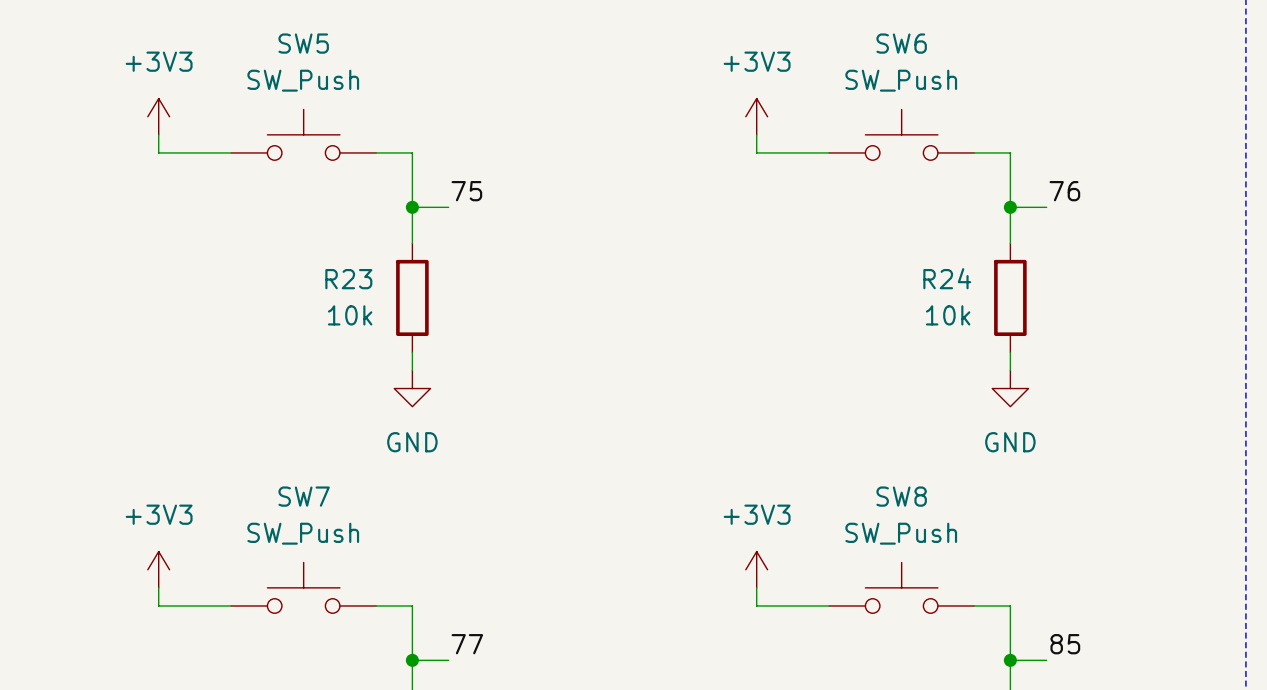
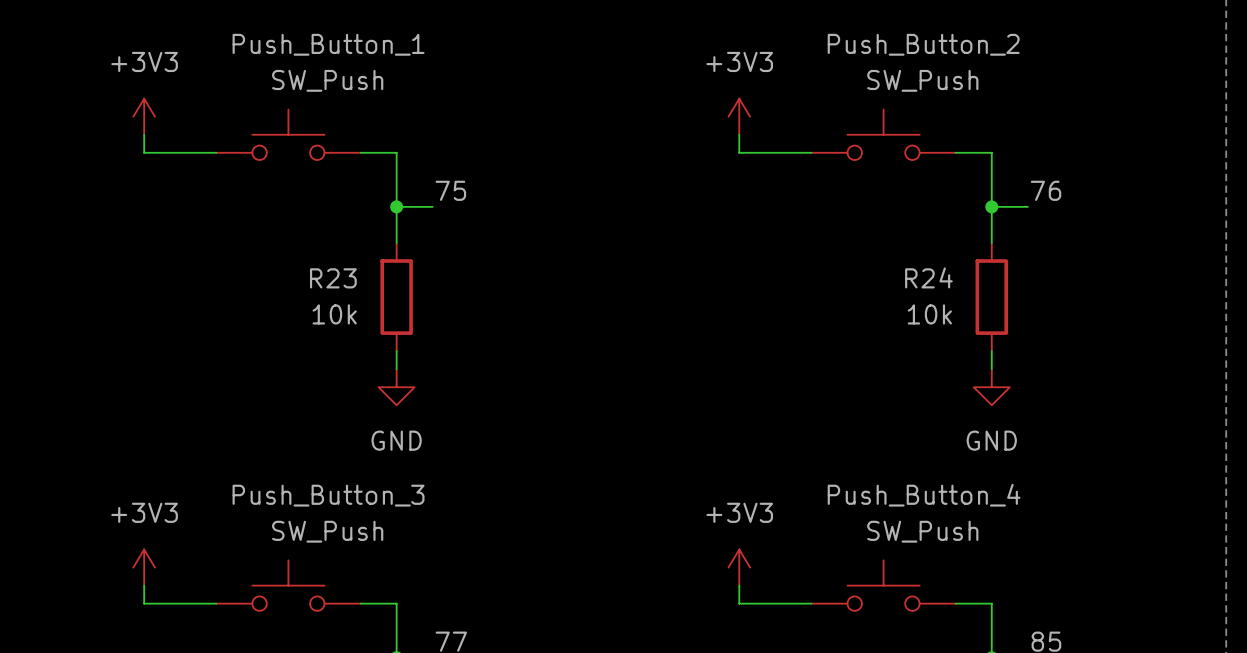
SW5 name: SW5 (303, 43) -> Push_Button_1 (328, 44)
SW6 name: SW6 (901, 43) -> Push_Button_2 (923, 44)
SW5 value position: SW_Push (303, 80) -> SW_Push (327, 80)
SW6 value position: SW_Push (901, 80) -> SW_Push (922, 80)
SW7 name: SW7 (304, 496) -> Push_Button_3 (328, 495)
SW8 name: SW8 (901, 496) -> Push_Button_4 (924, 495)
SW7 value position: SW_Push (303, 533) -> SW_Push (327, 531)
SW8 value position: SW_Push (901, 533) -> SW_Push (922, 531)

